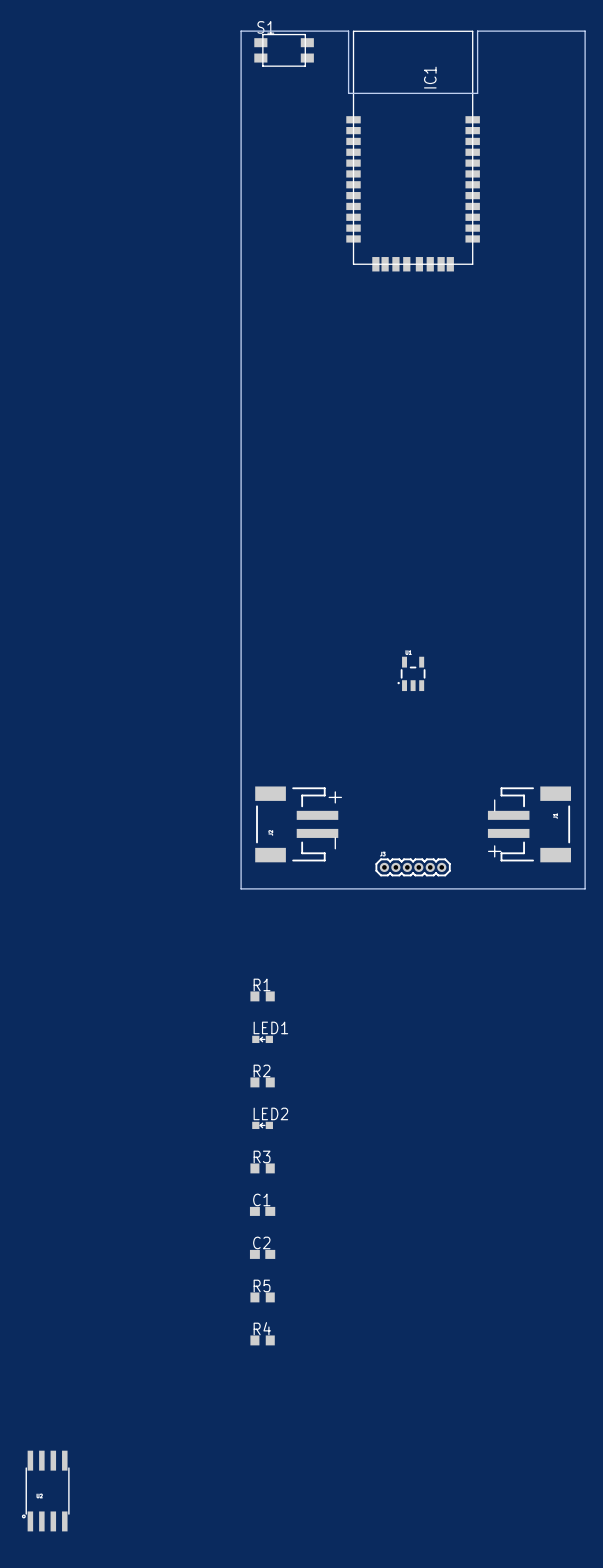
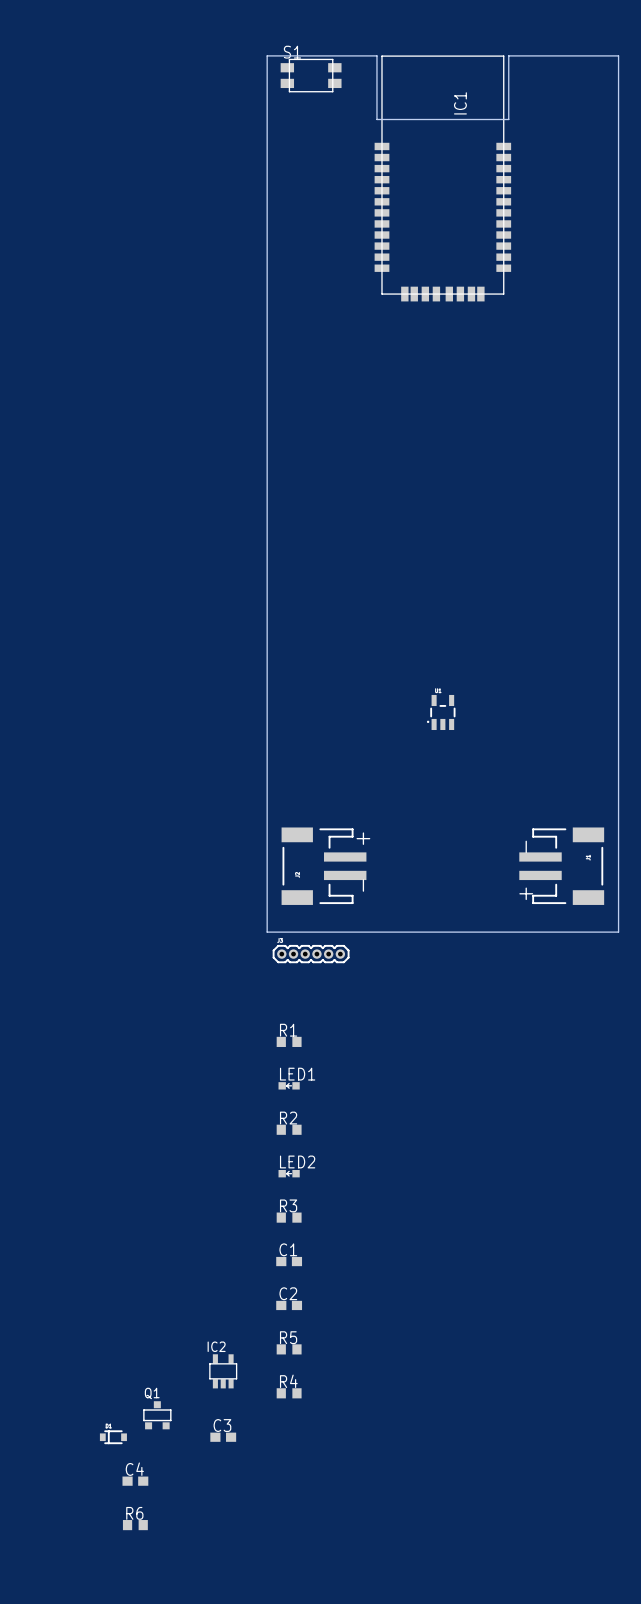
part position: (413, 867) -> (311, 954)
IC2: none -> (223, 1371)
Q1: none -> (157, 1415)
part: none -> (113, 1437)
C3: none -> (223, 1437)
C4: none -> (135, 1481)
R6: none -> (135, 1525)
part: (45, 1491) -> none

